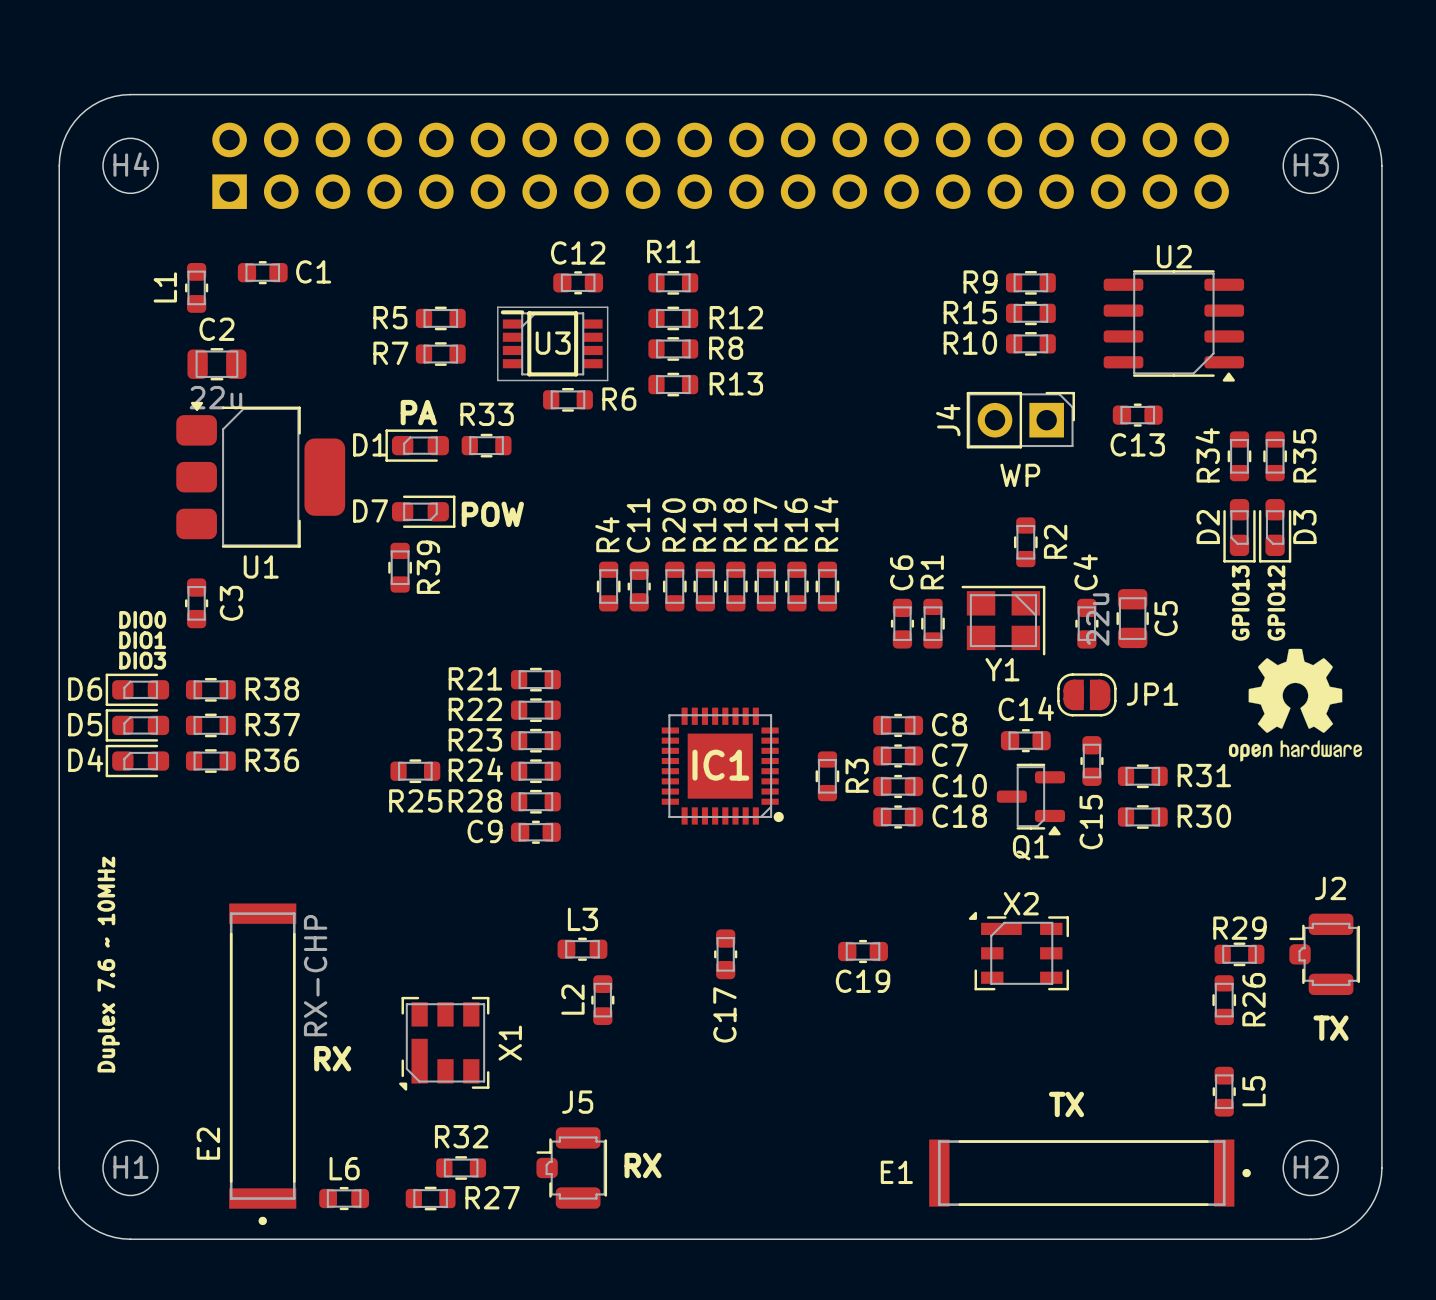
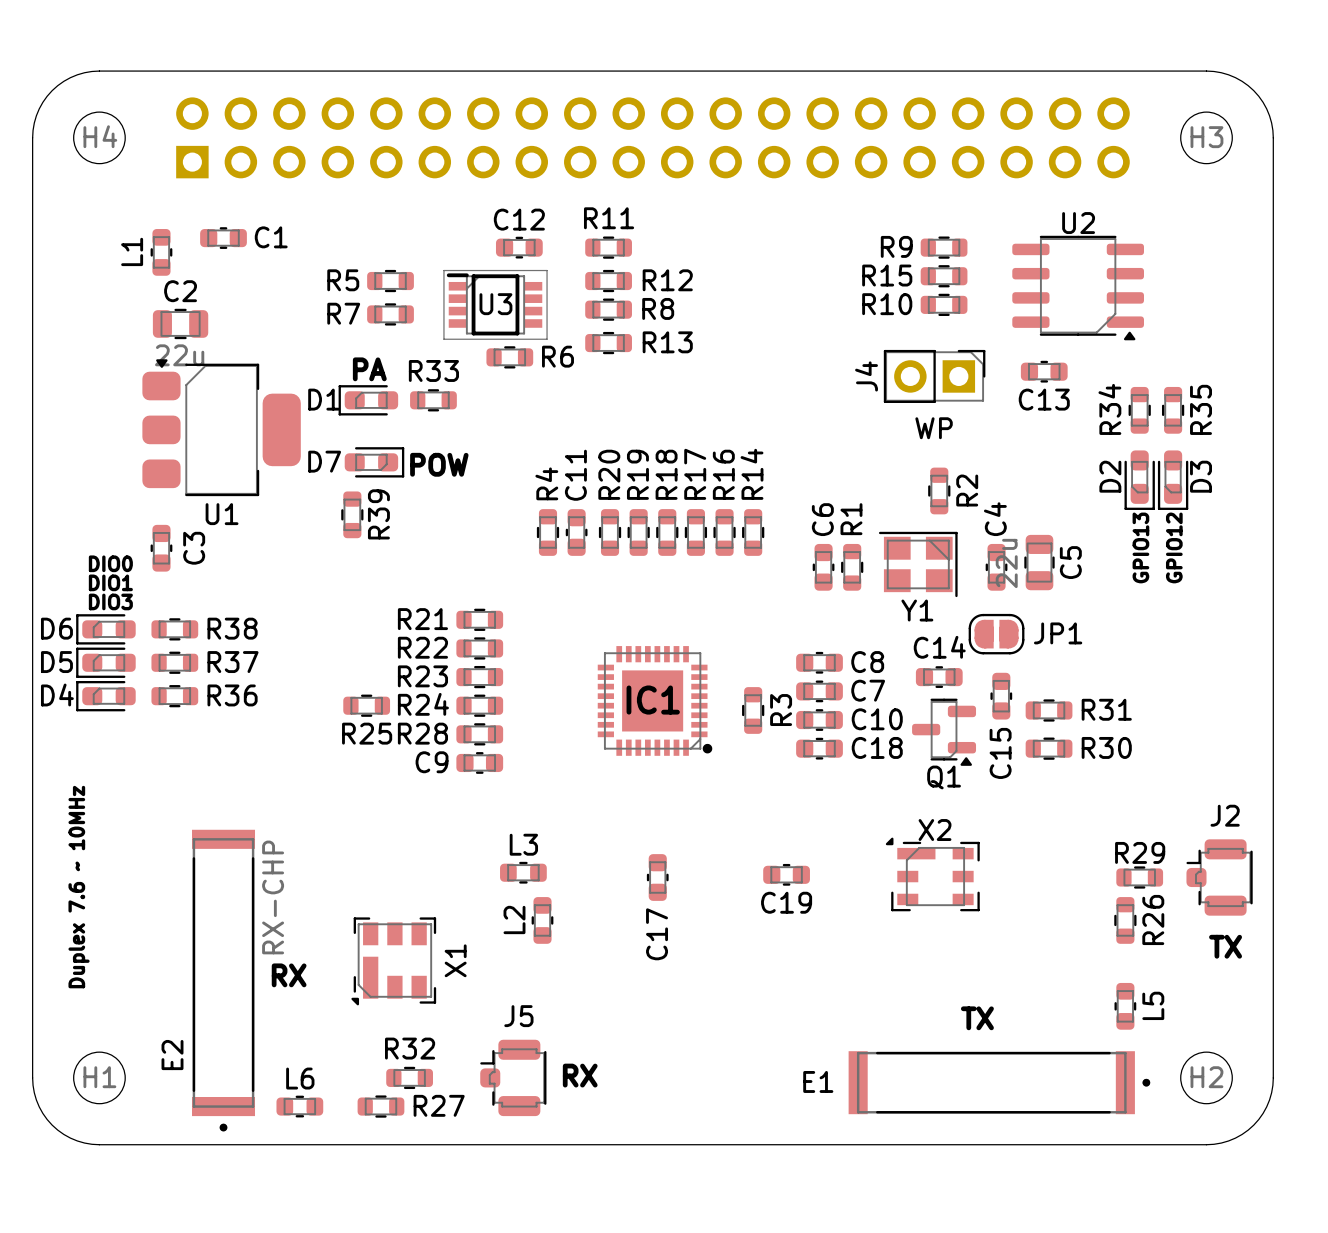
drawing: [1228, 648, 1363, 762] -> none

